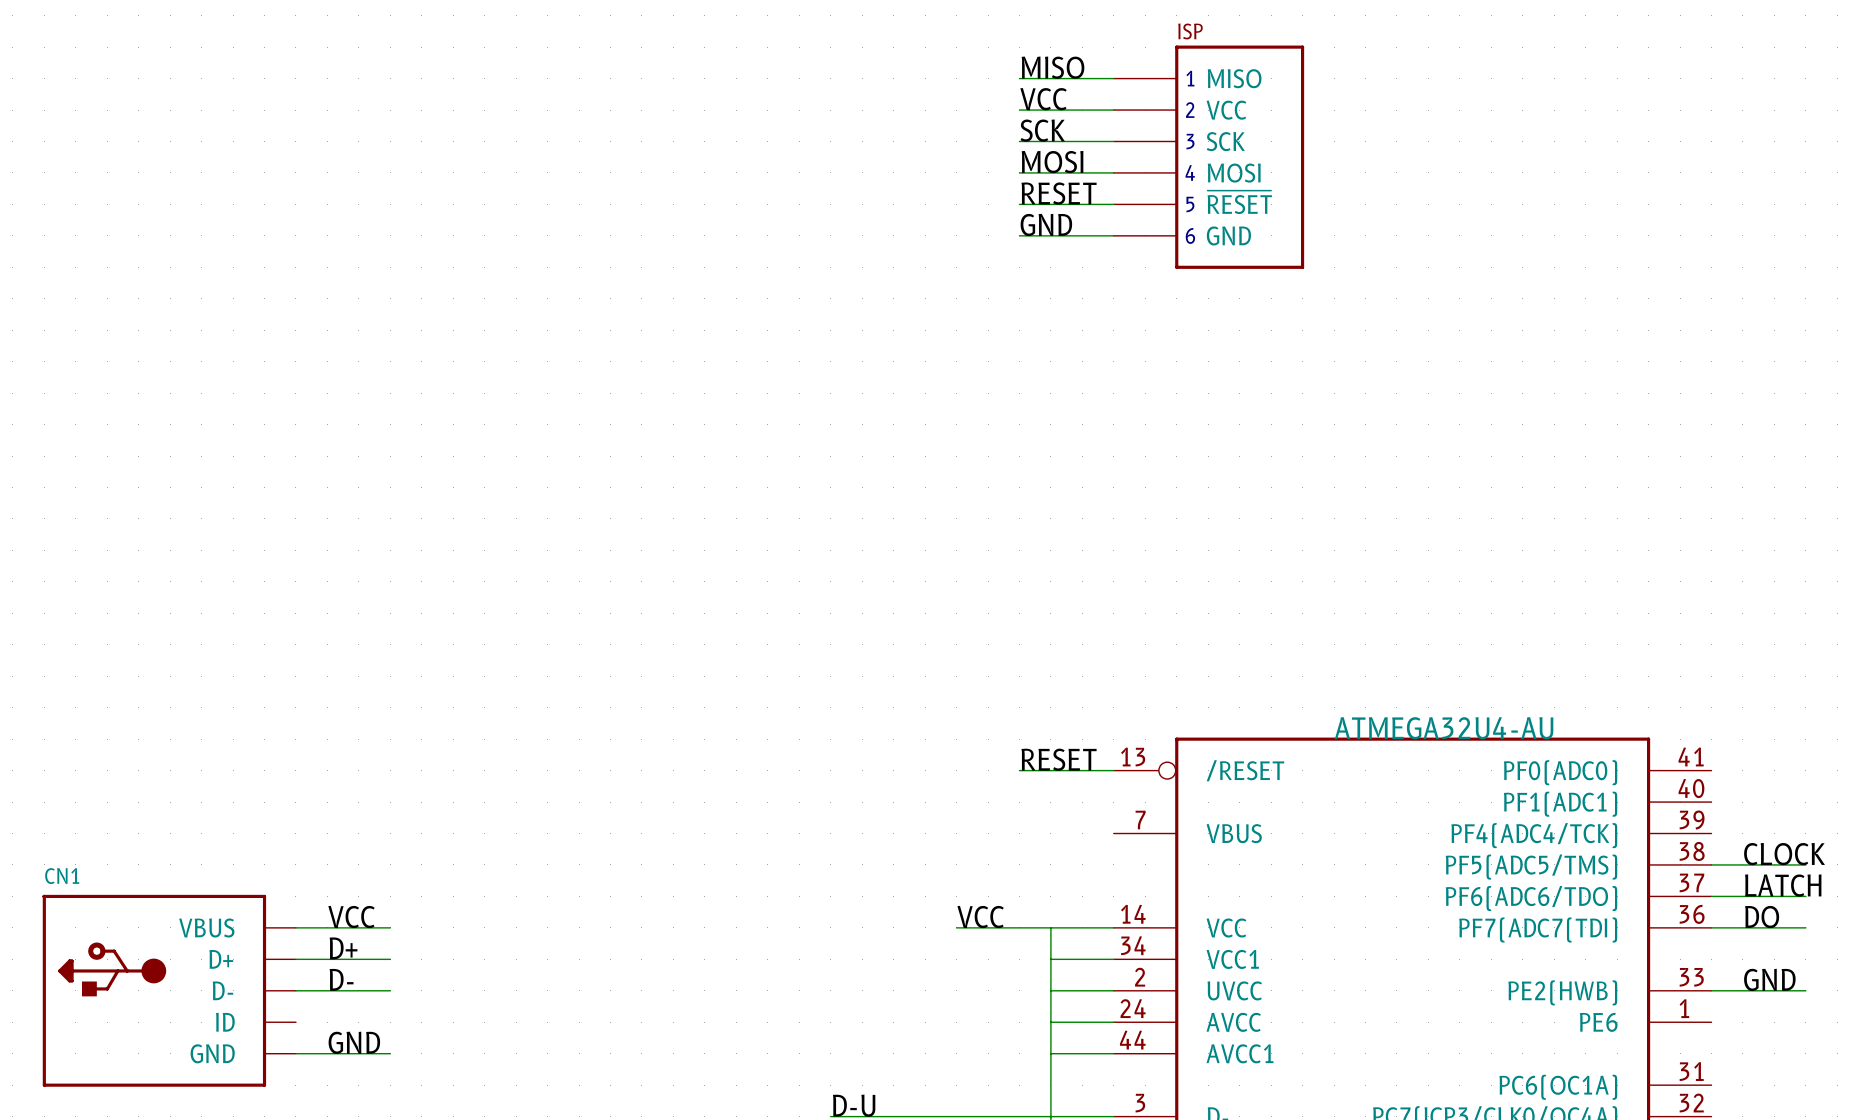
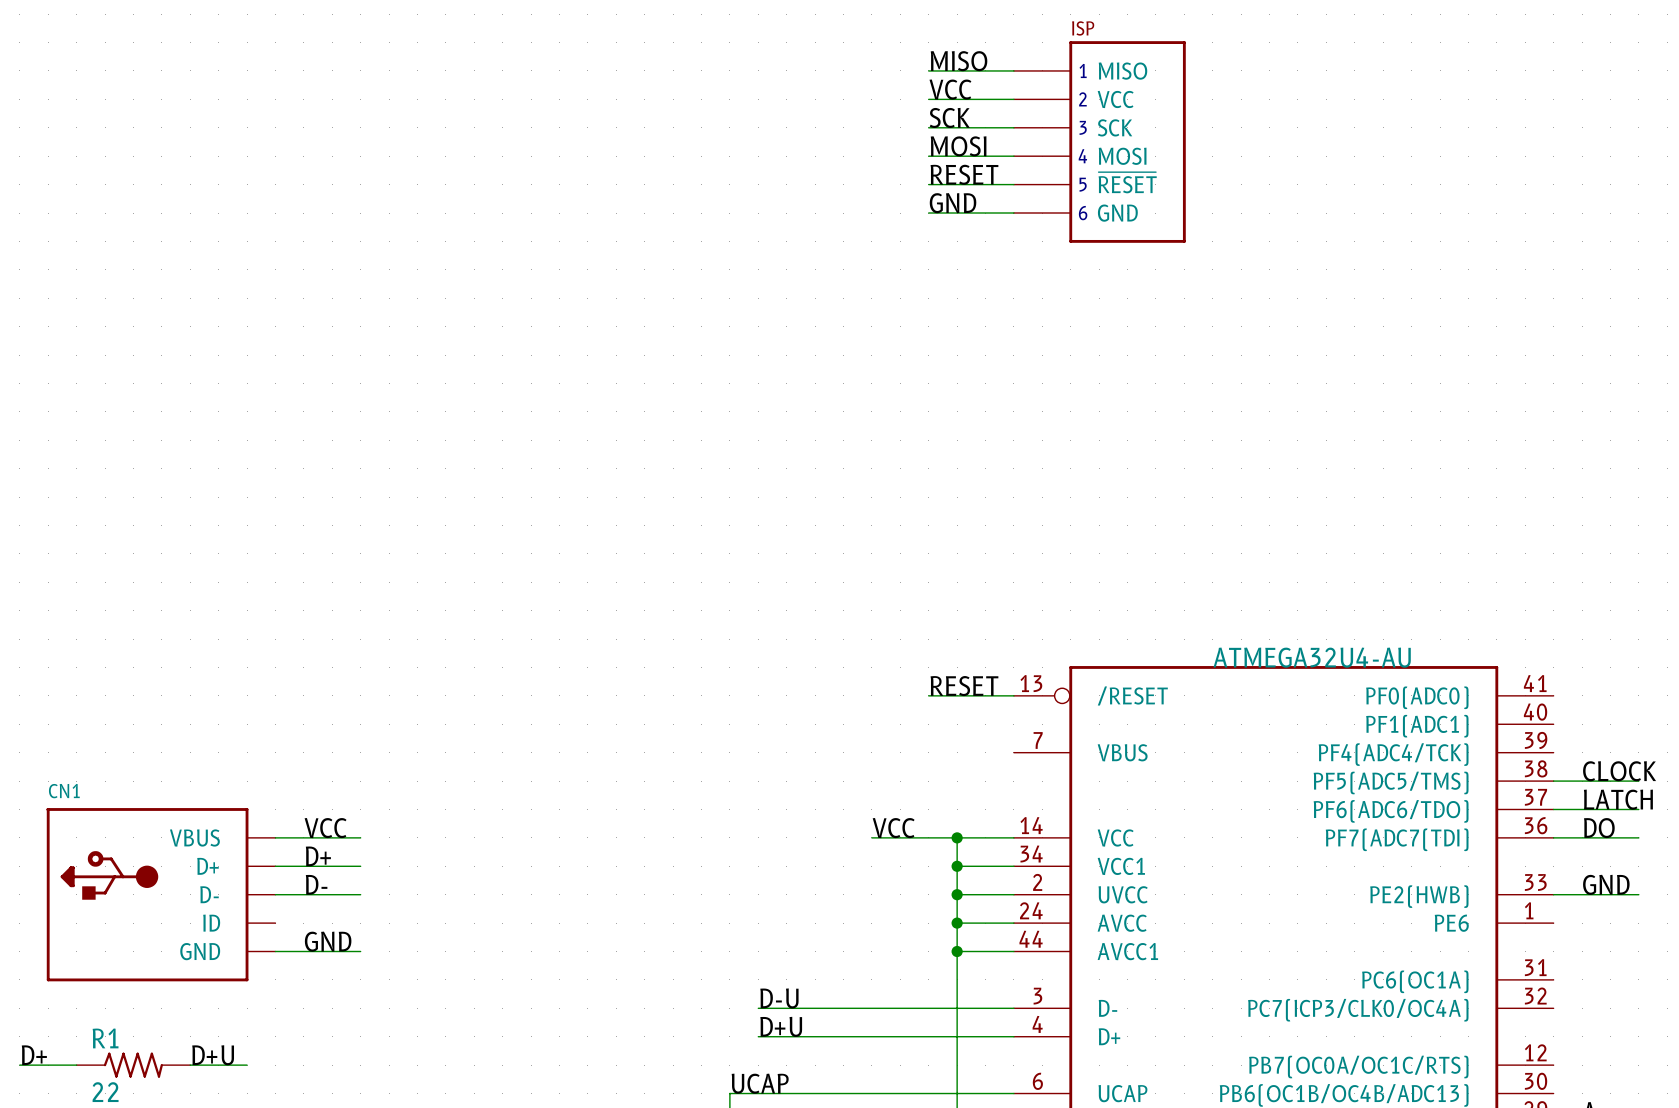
junction: none -> (957, 837)
junction: none -> (957, 866)
junction: none -> (957, 894)
junction: none -> (957, 923)
junction: none -> (957, 951)

